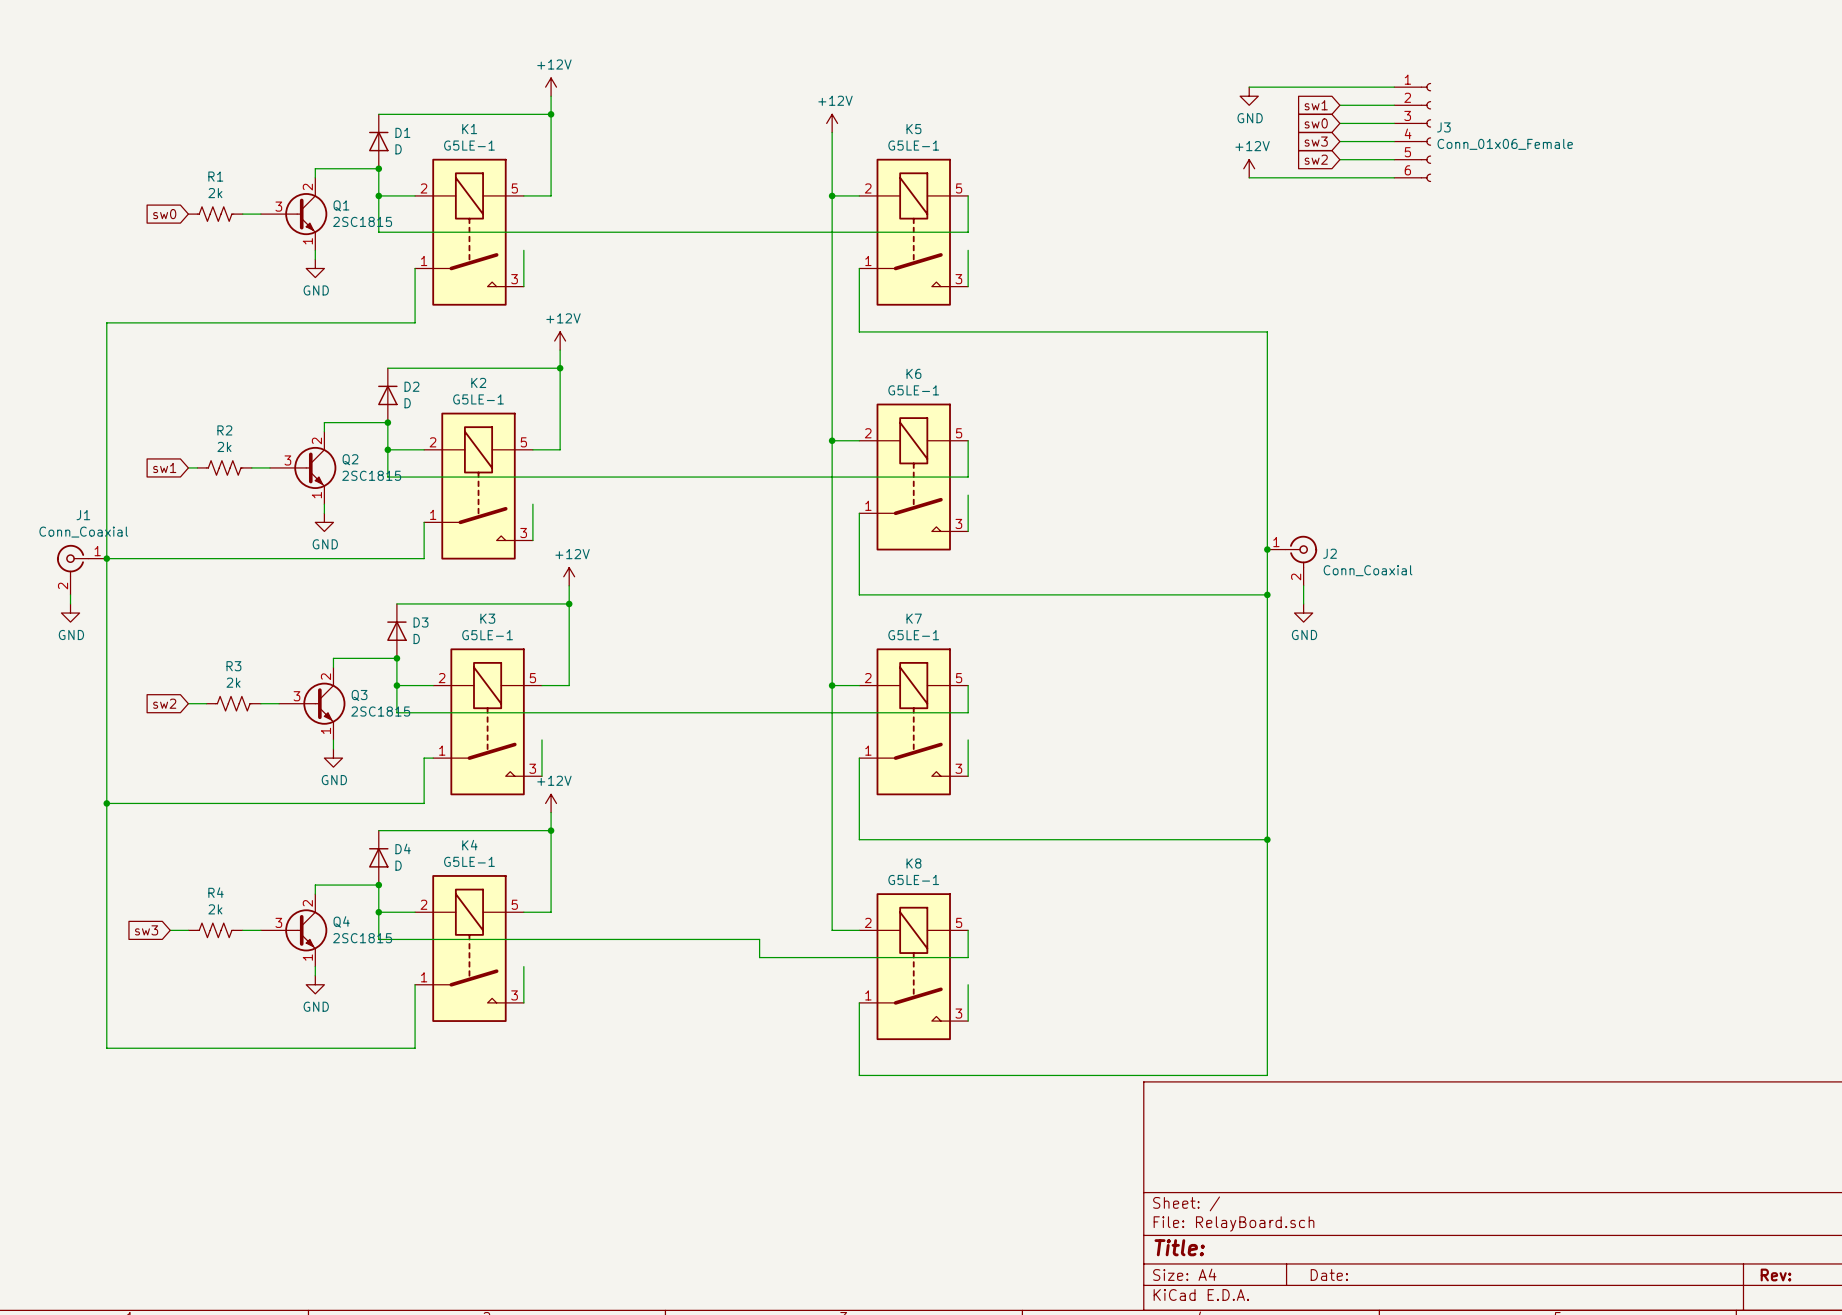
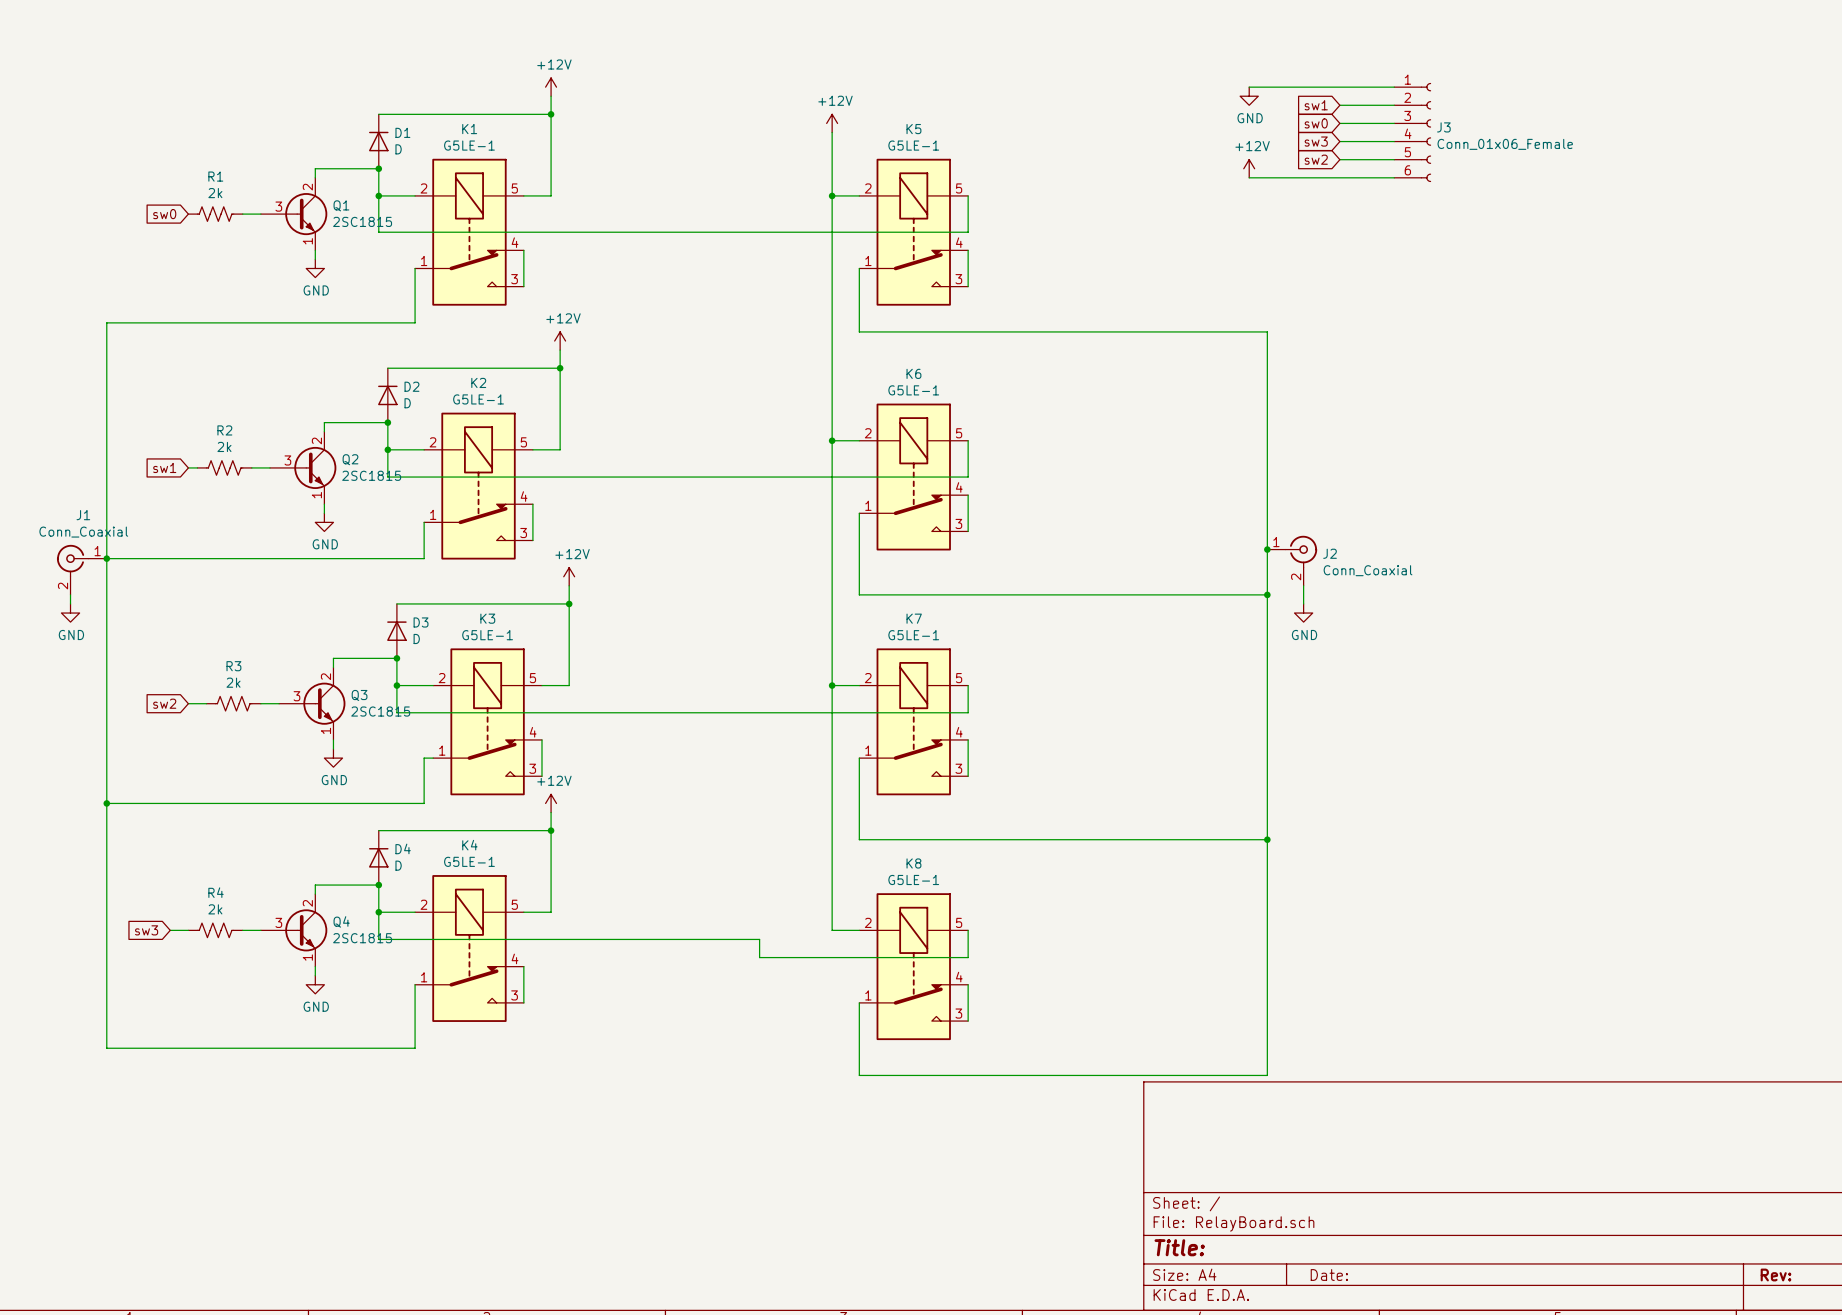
K1 symbol: [415, 158, 524, 306] -> [415, 158, 524, 306]
K5 symbol: [859, 158, 969, 306] -> [859, 158, 969, 306]
K6 symbol: [859, 403, 969, 551] -> [859, 403, 969, 551]
K2 symbol: [424, 412, 533, 560] -> [424, 412, 533, 560]
K3 symbol: [433, 648, 542, 796] -> [433, 648, 542, 796]
K7 symbol: [859, 648, 969, 796] -> [859, 648, 969, 796]
K4 symbol: [415, 875, 524, 1022] -> [415, 875, 524, 1022]
K8 symbol: [859, 893, 969, 1041] -> [859, 893, 969, 1041]

